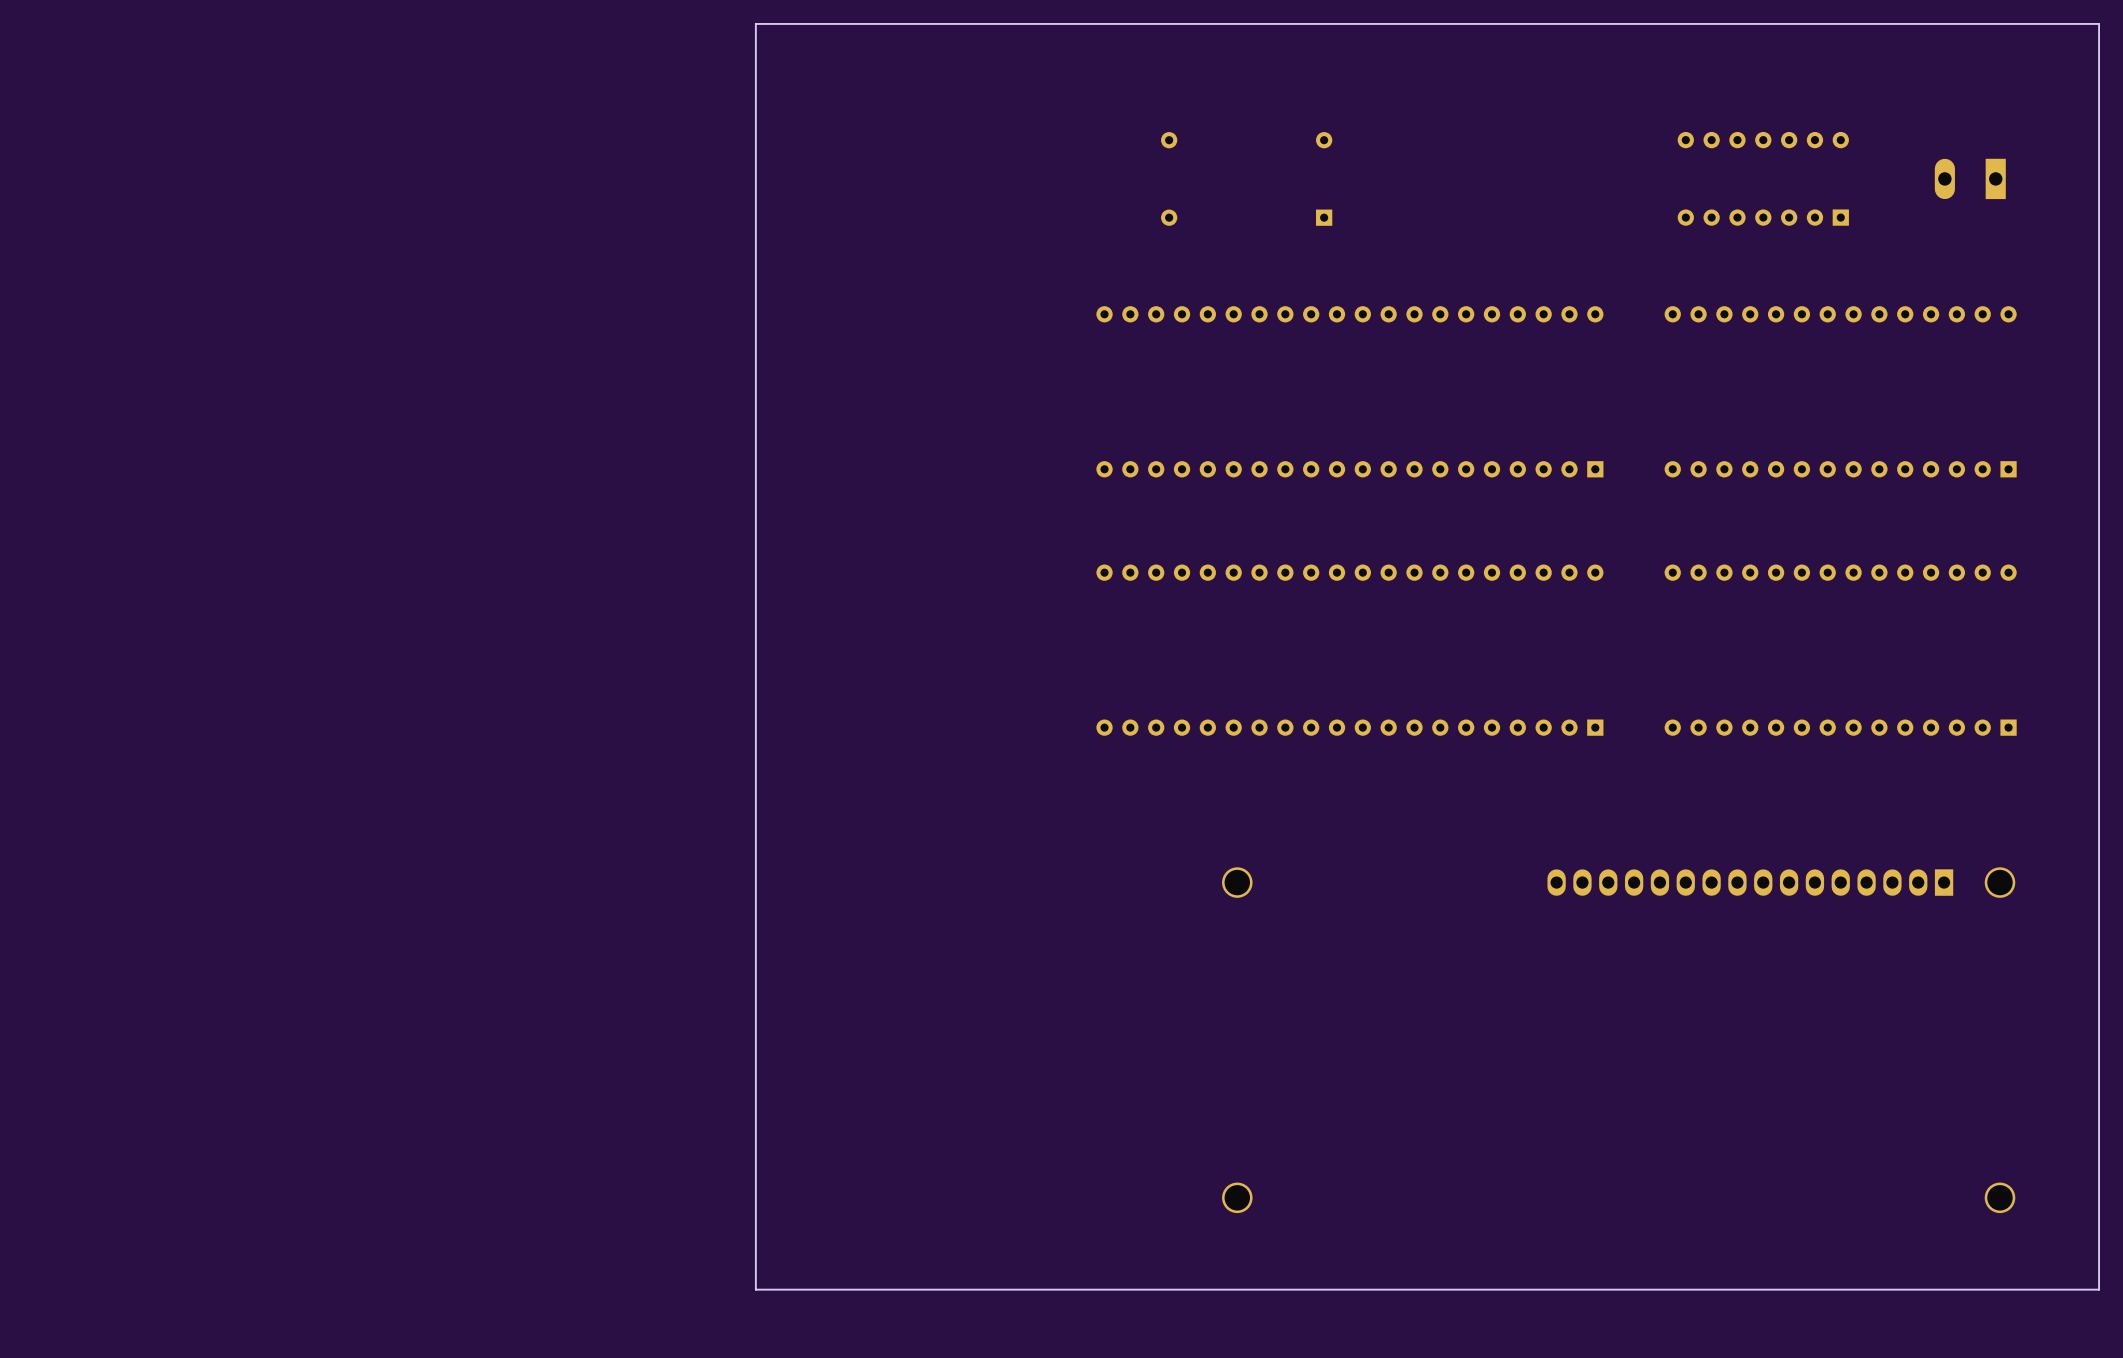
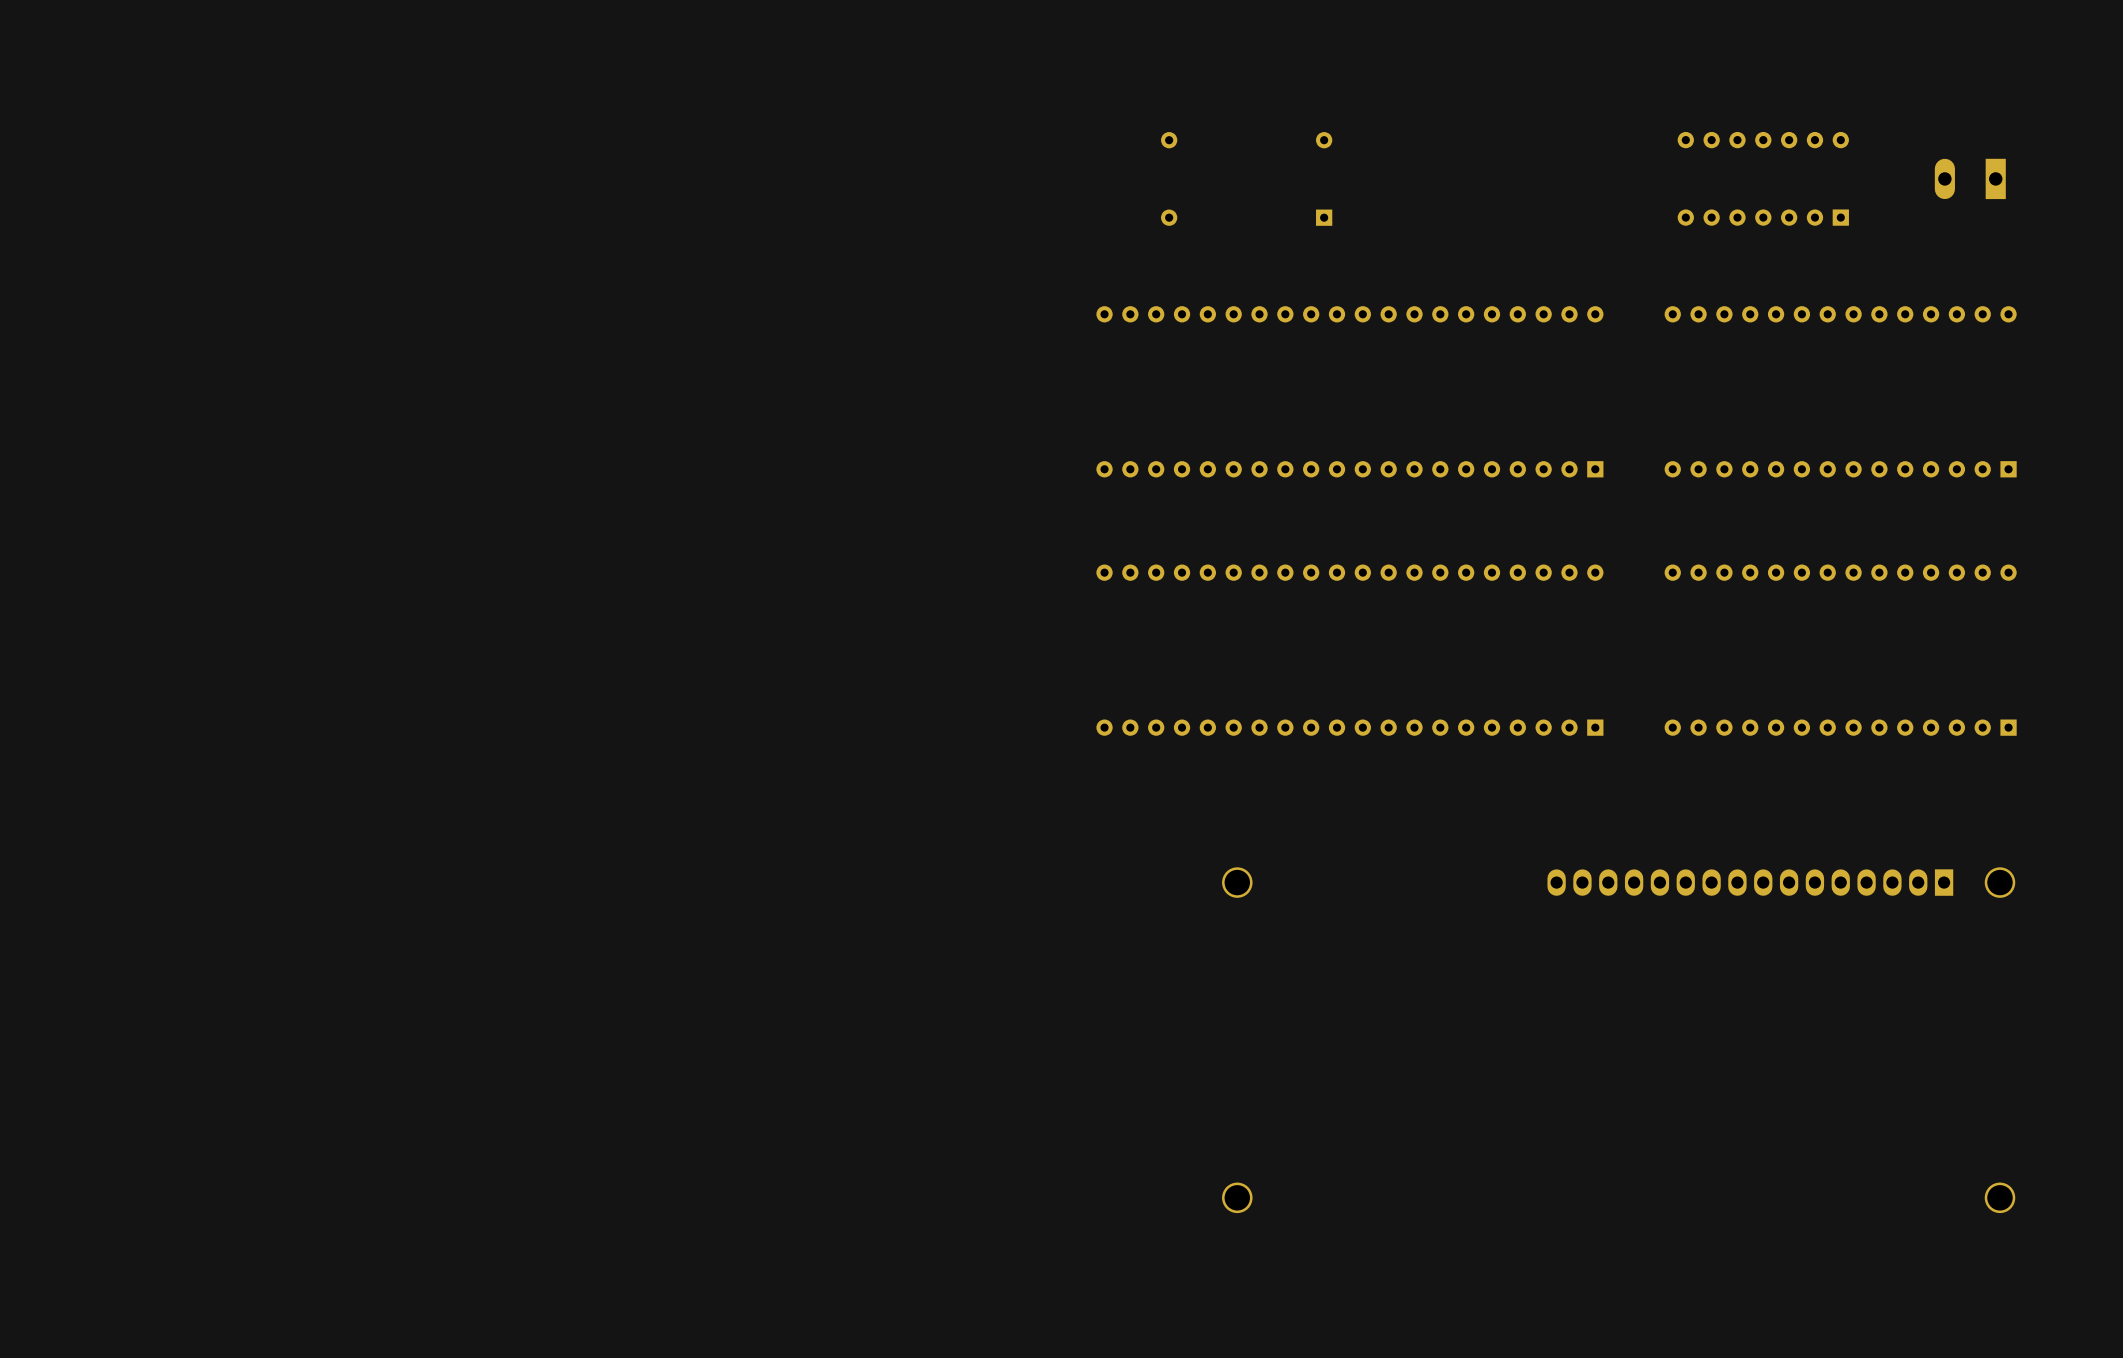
board edge: (2099, 23) (2099, 1289) (755, 1289) (755, 23) (2099, 23) -> none

